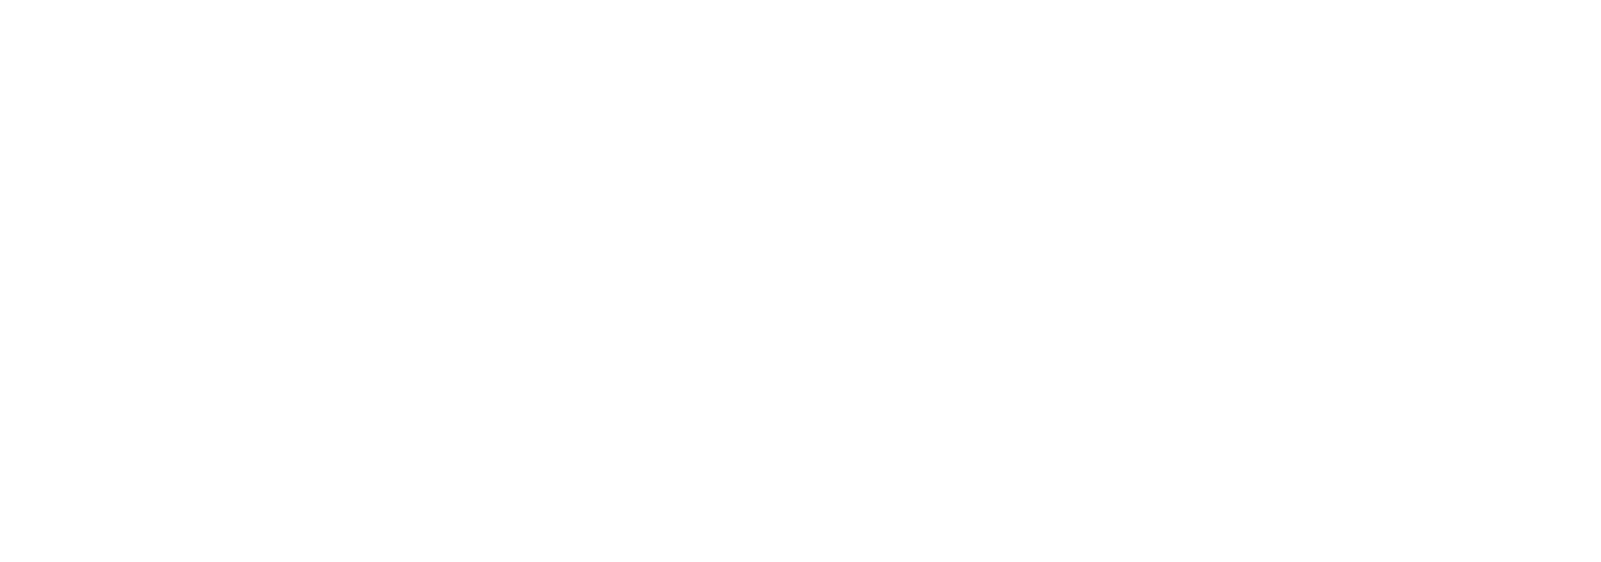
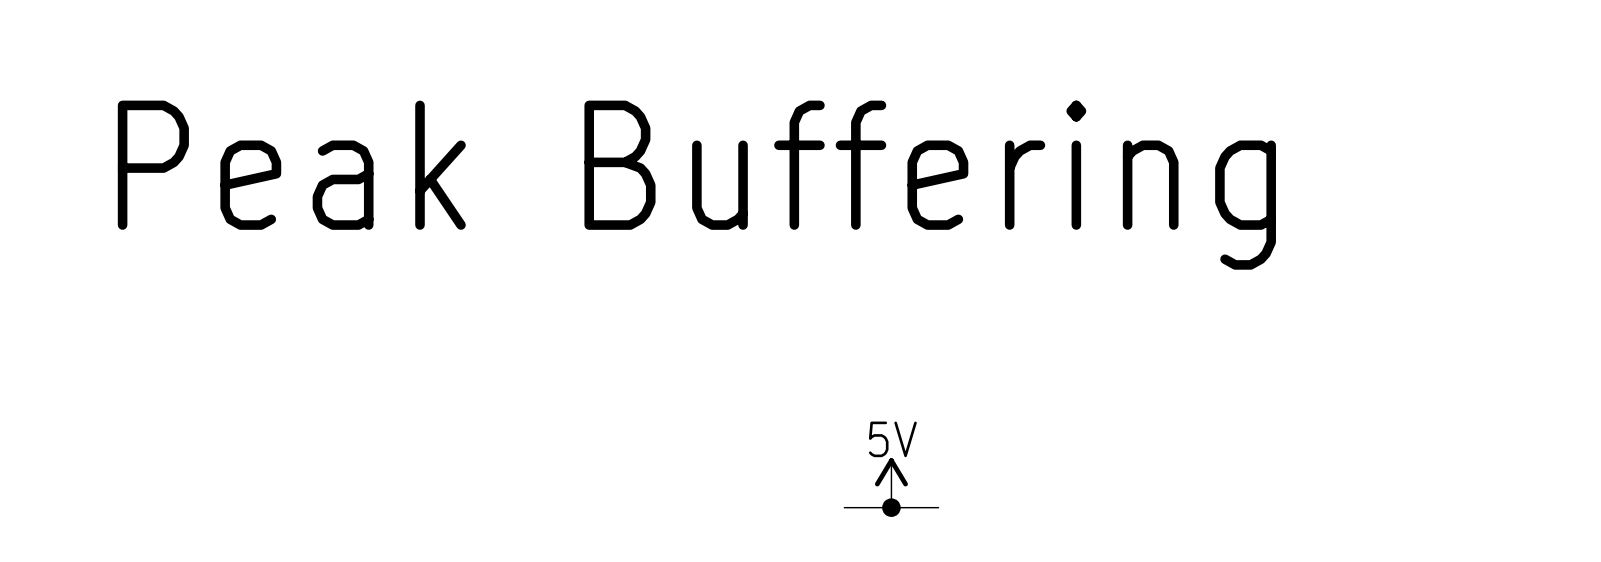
text: none -> Peak Buffering (696, 185)
power symbol: none -> 5V (891, 482)
wire: none -> (844, 507) (938, 507)
junction: none -> (891, 507)

